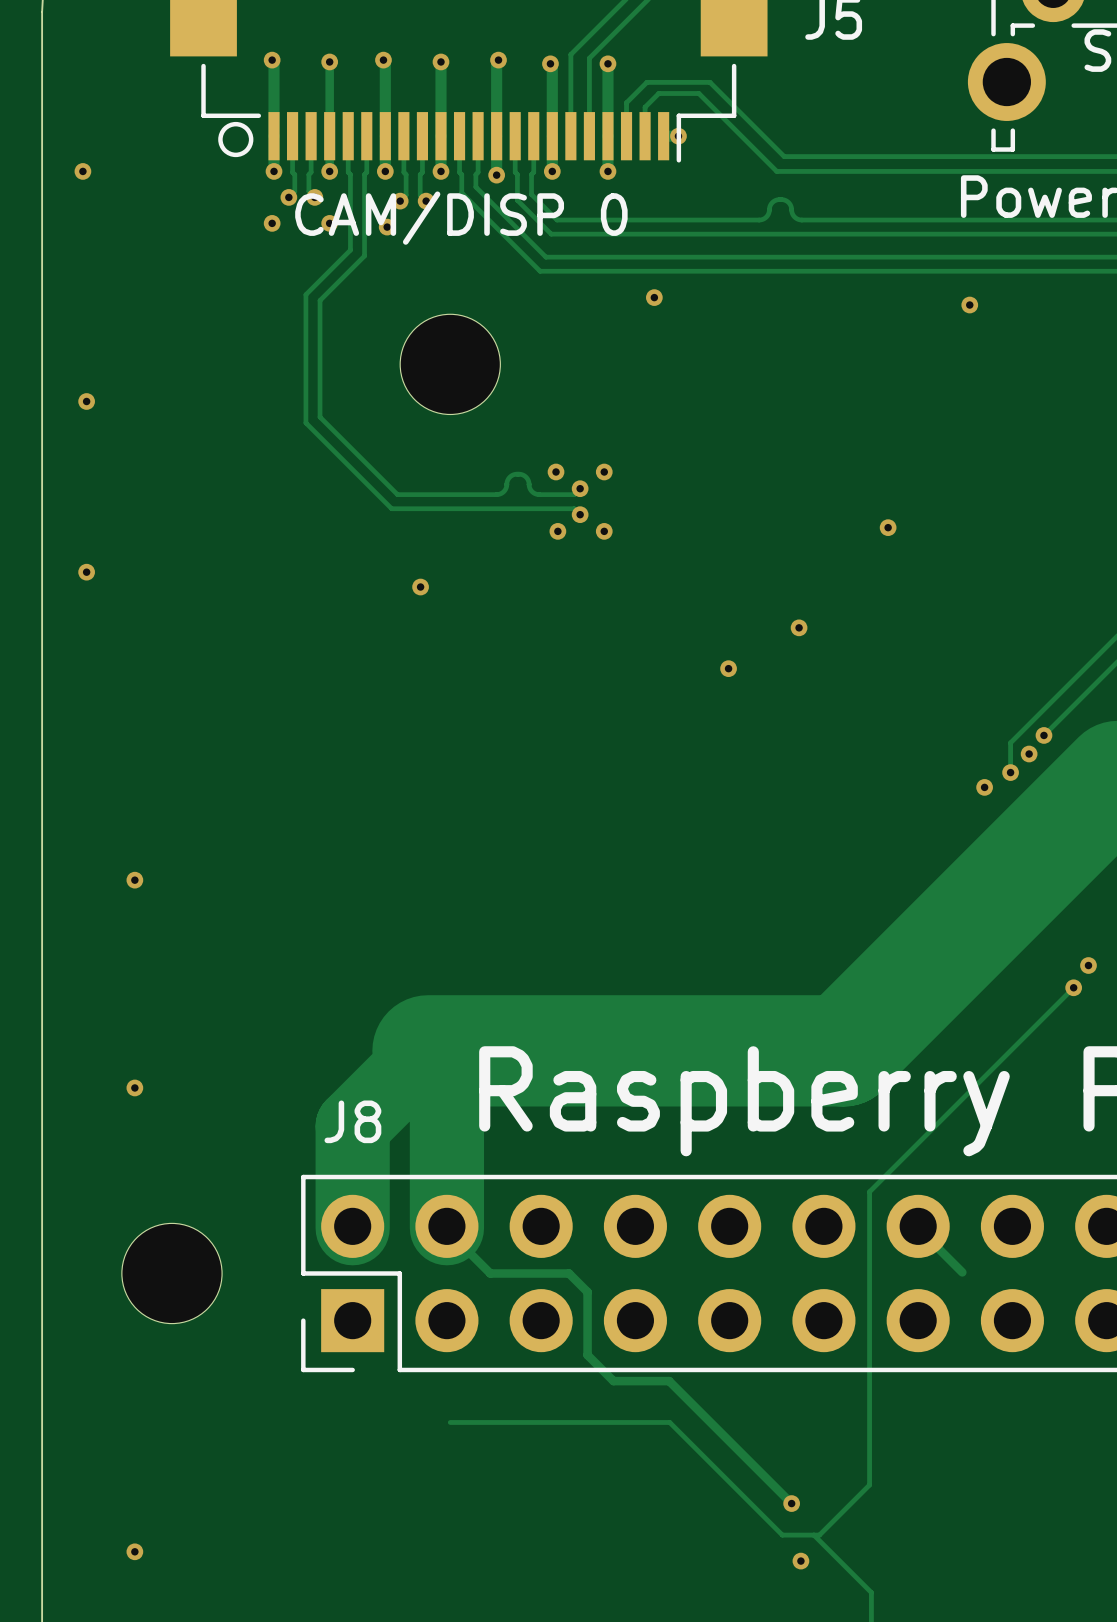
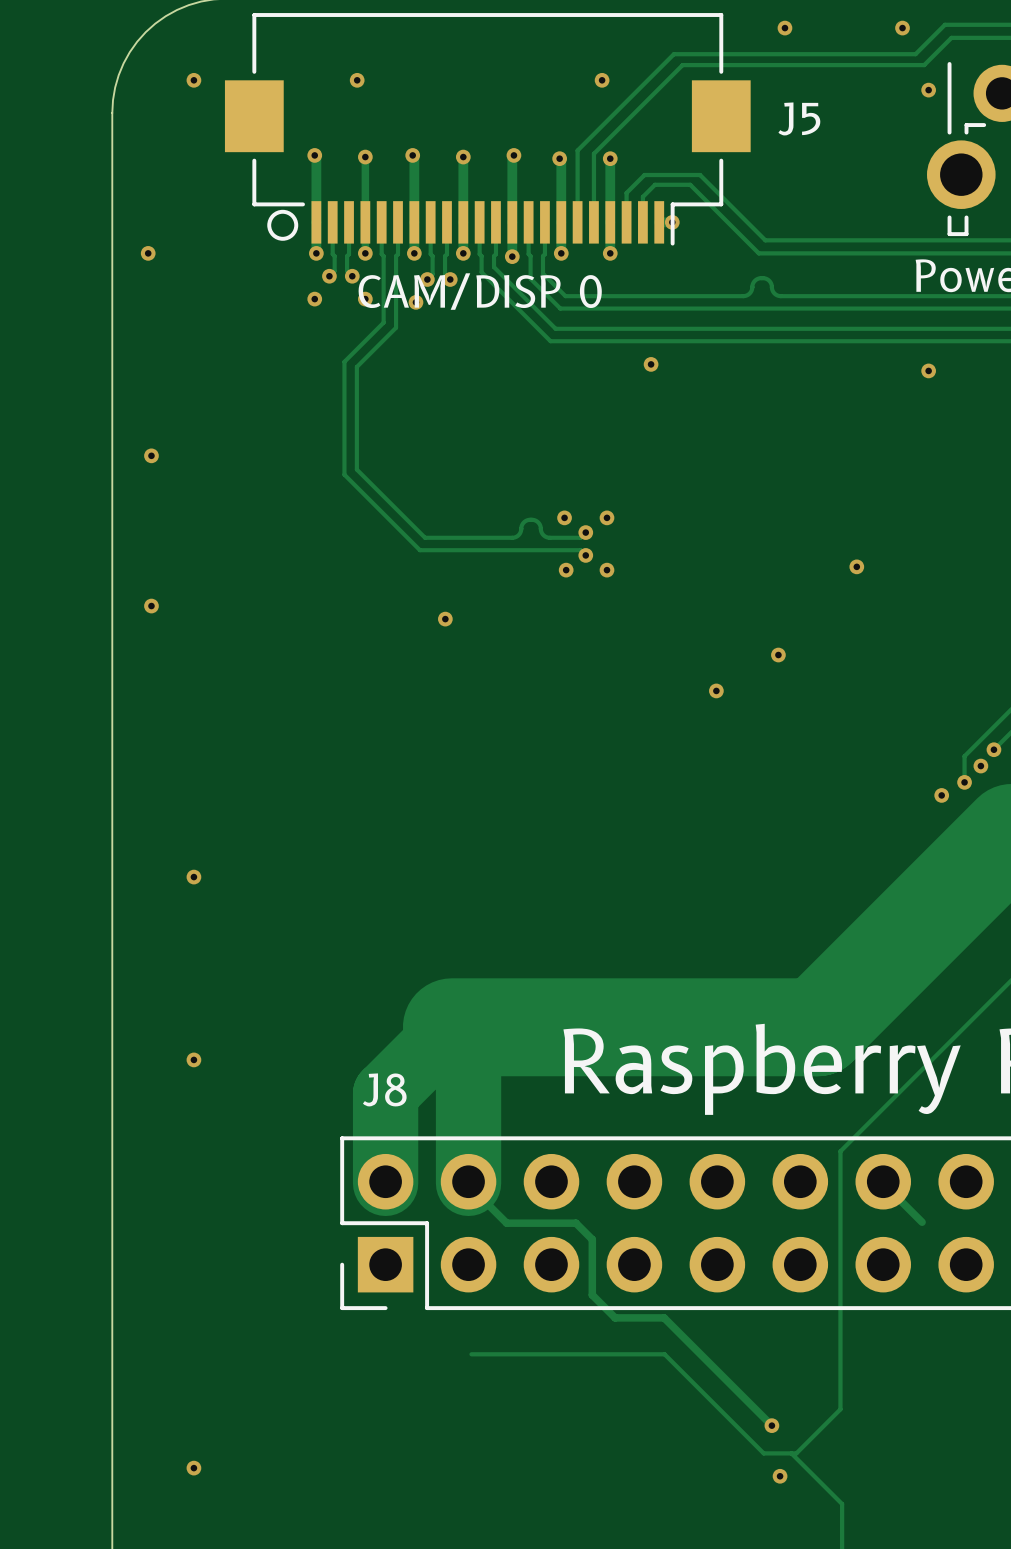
part: (450, 364) -> none
part: (171, 1273) -> none

